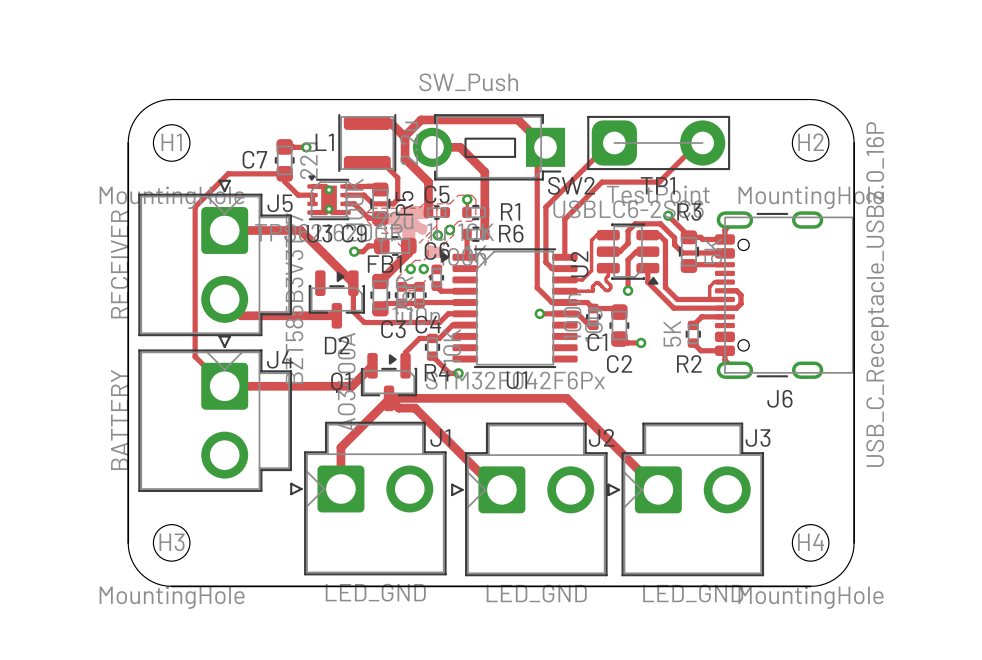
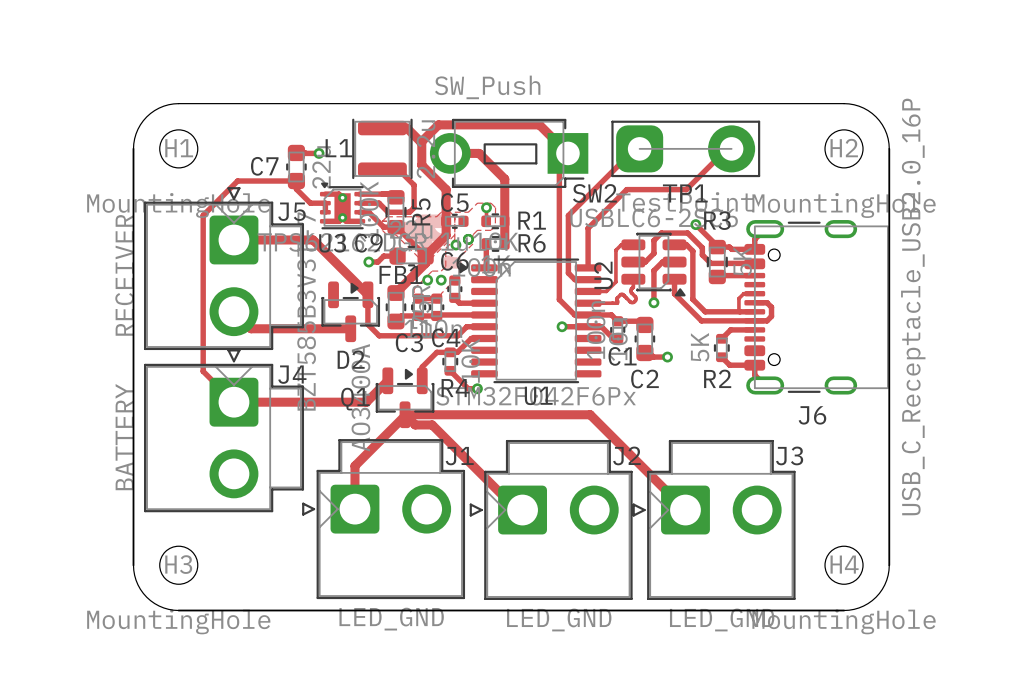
track: none -> (446, 221) (446, 235) (425, 256) (396, 227)

